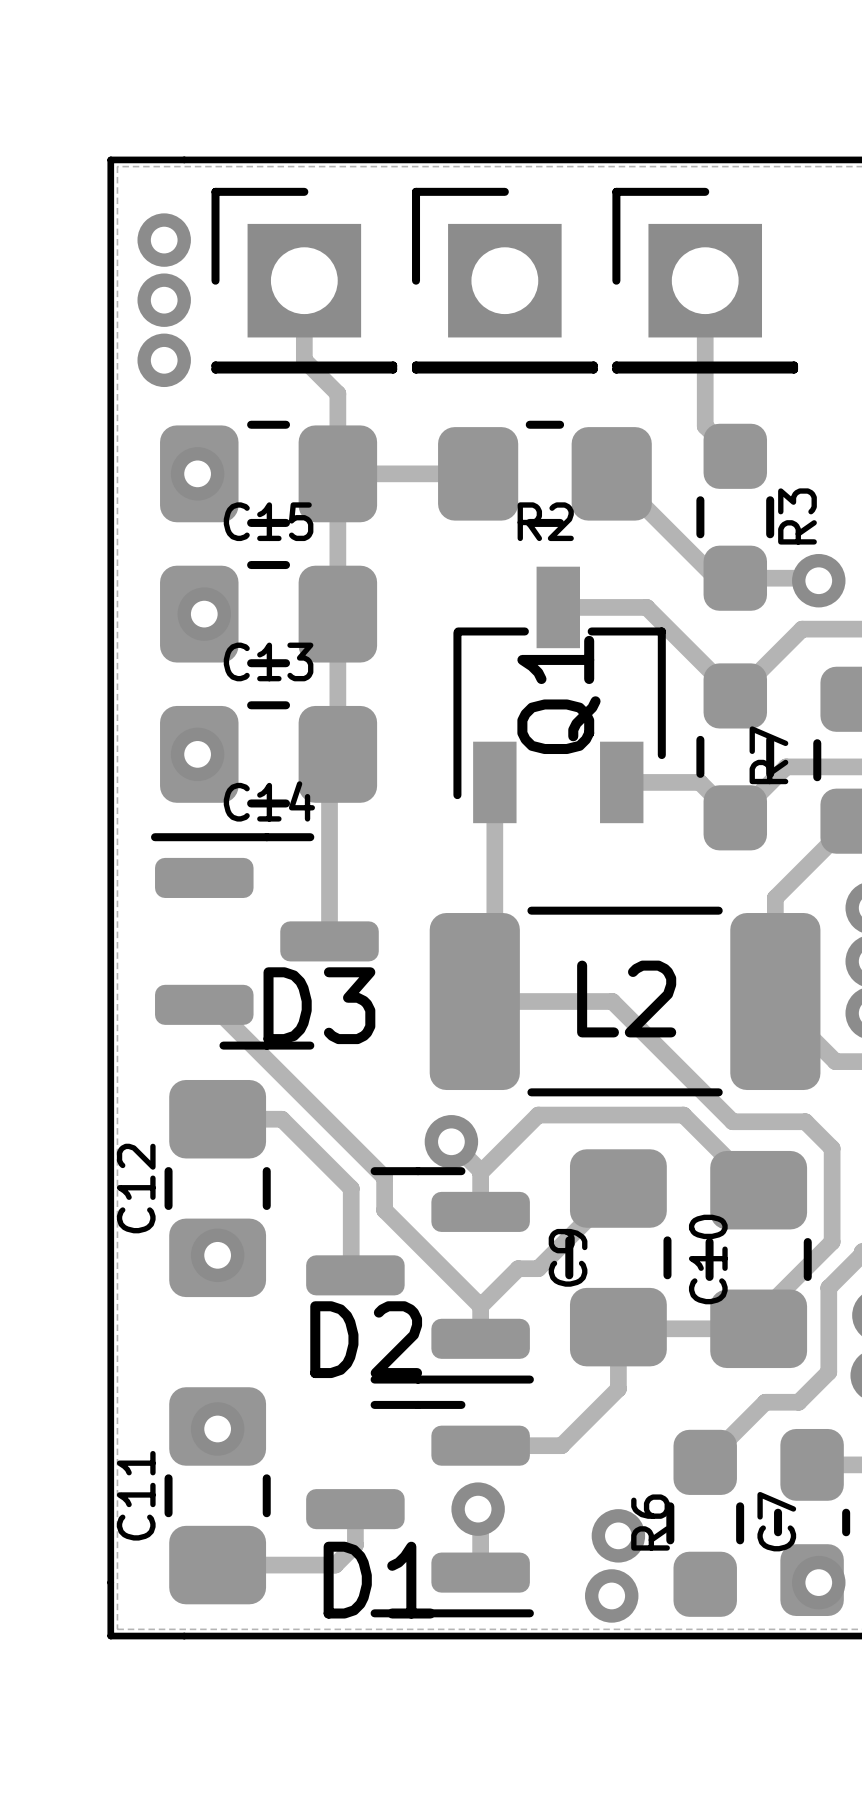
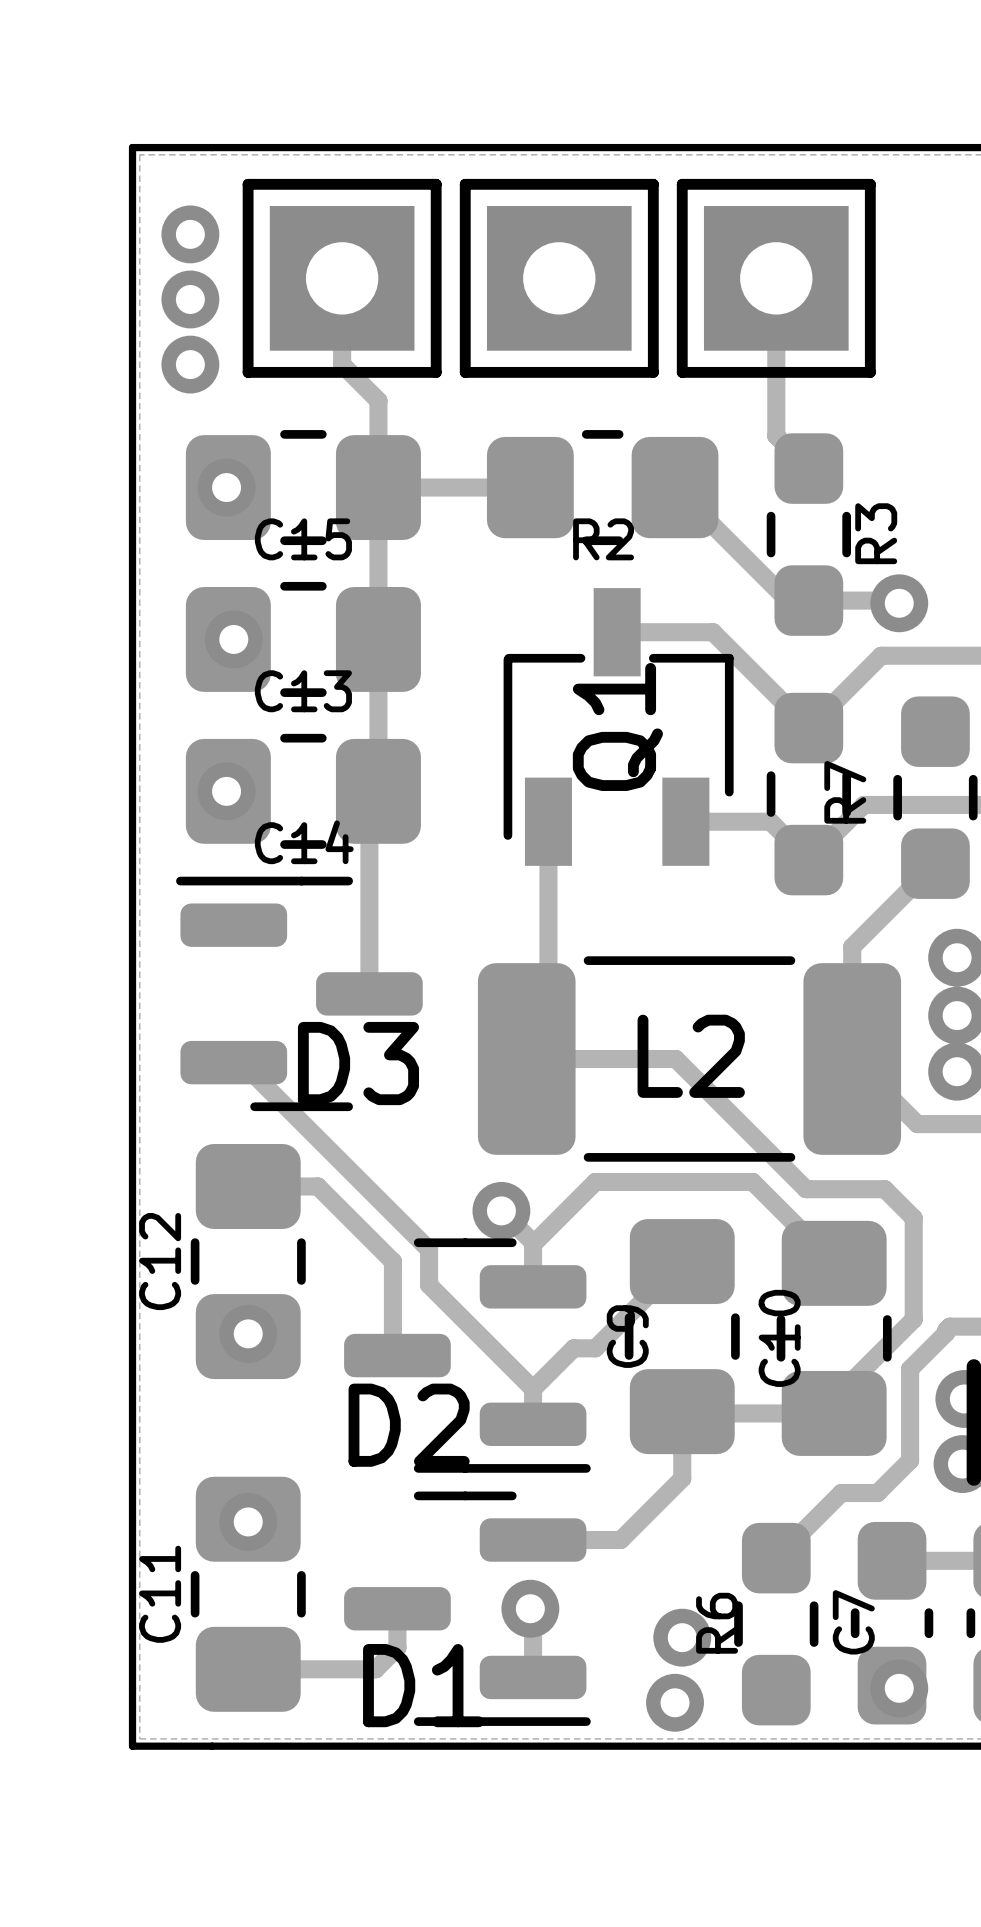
part footprint: [211, 187, 398, 374] -> [242, 178, 442, 378]
part footprint: [412, 187, 598, 374] -> [459, 178, 659, 378]
part footprint: [612, 187, 799, 374] -> [676, 178, 876, 378]

